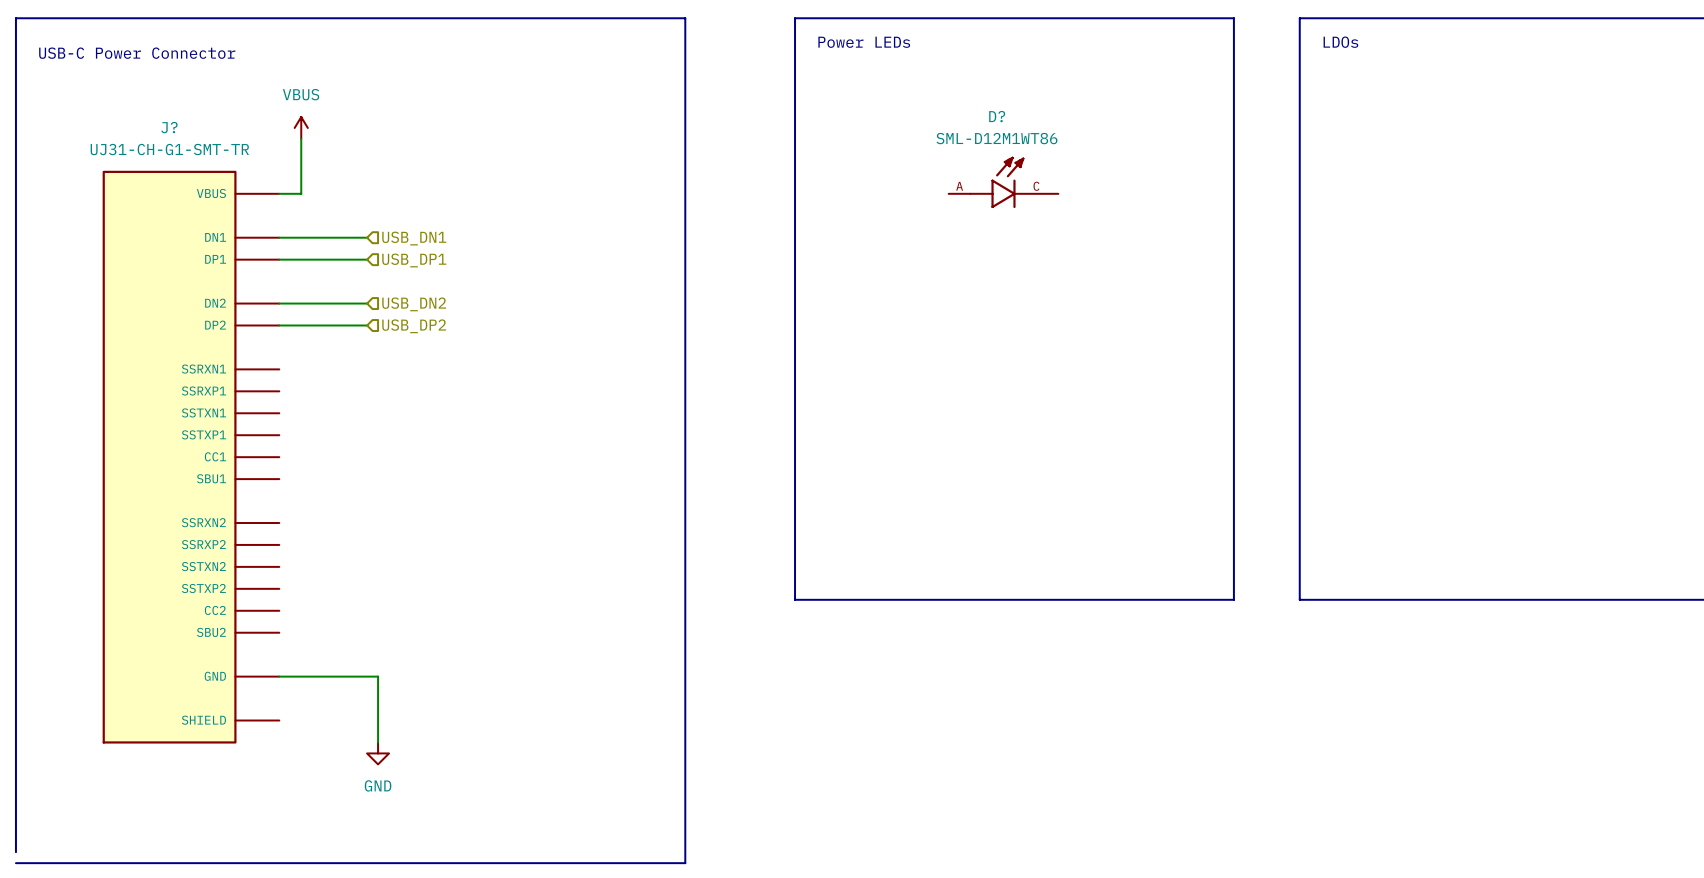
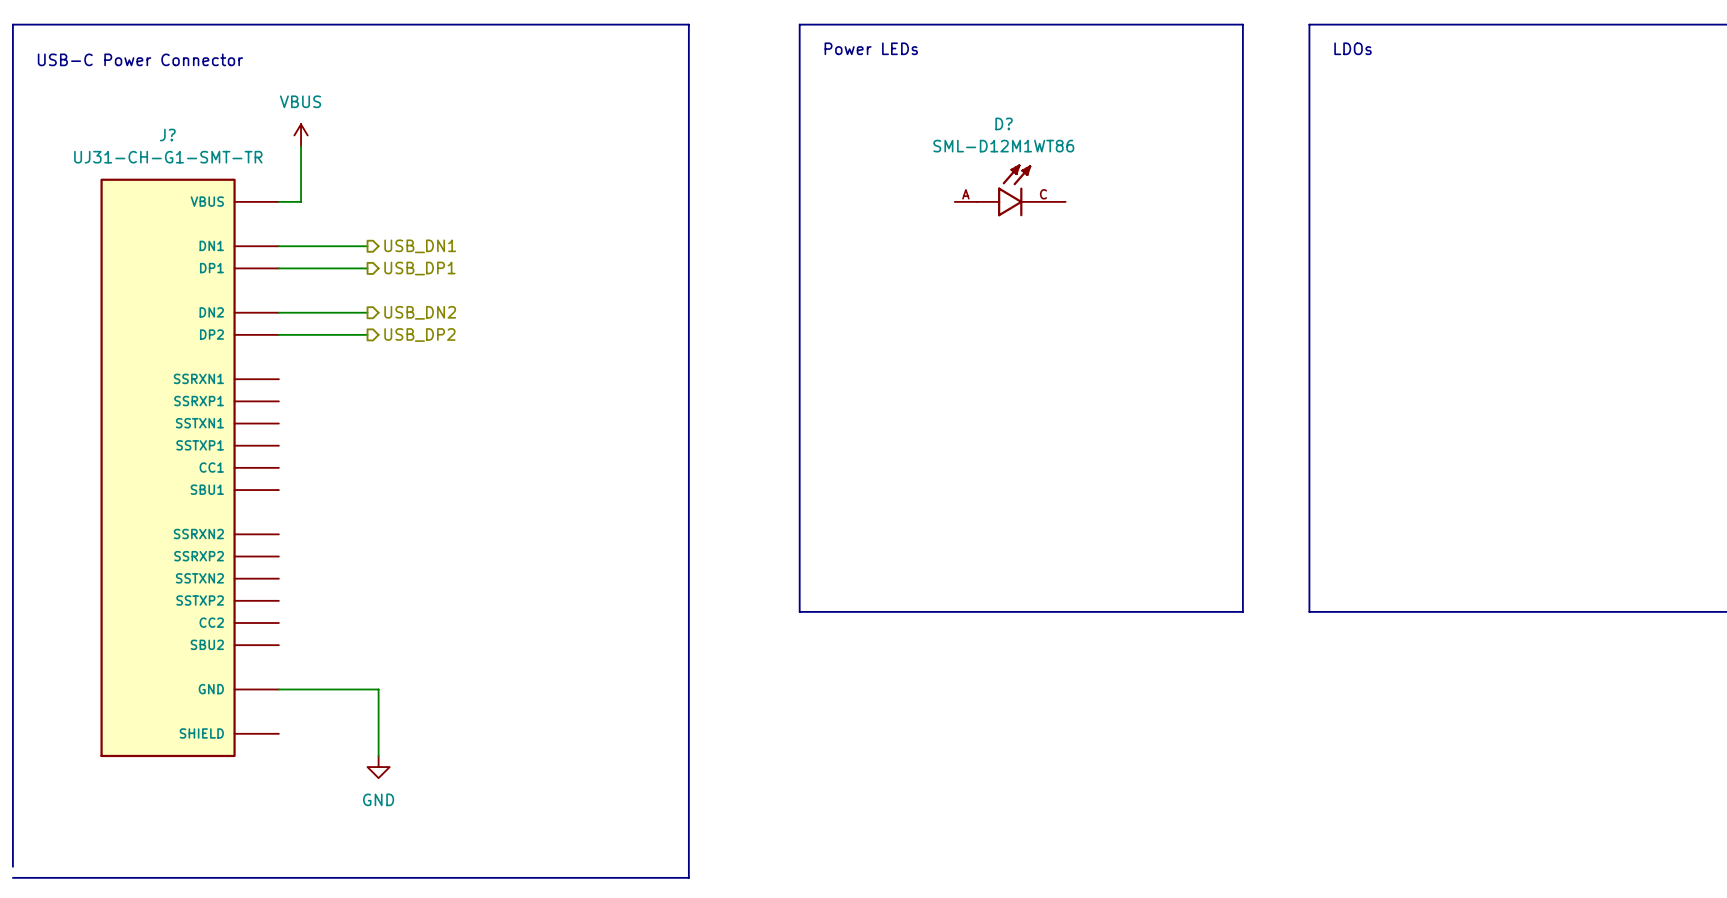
hierarchical label shape: input (414, 238) -> output (420, 246)
hierarchical label shape: input (414, 260) -> output (419, 268)
hierarchical label shape: input (414, 304) -> output (420, 312)
hierarchical label shape: input (414, 326) -> output (419, 335)

